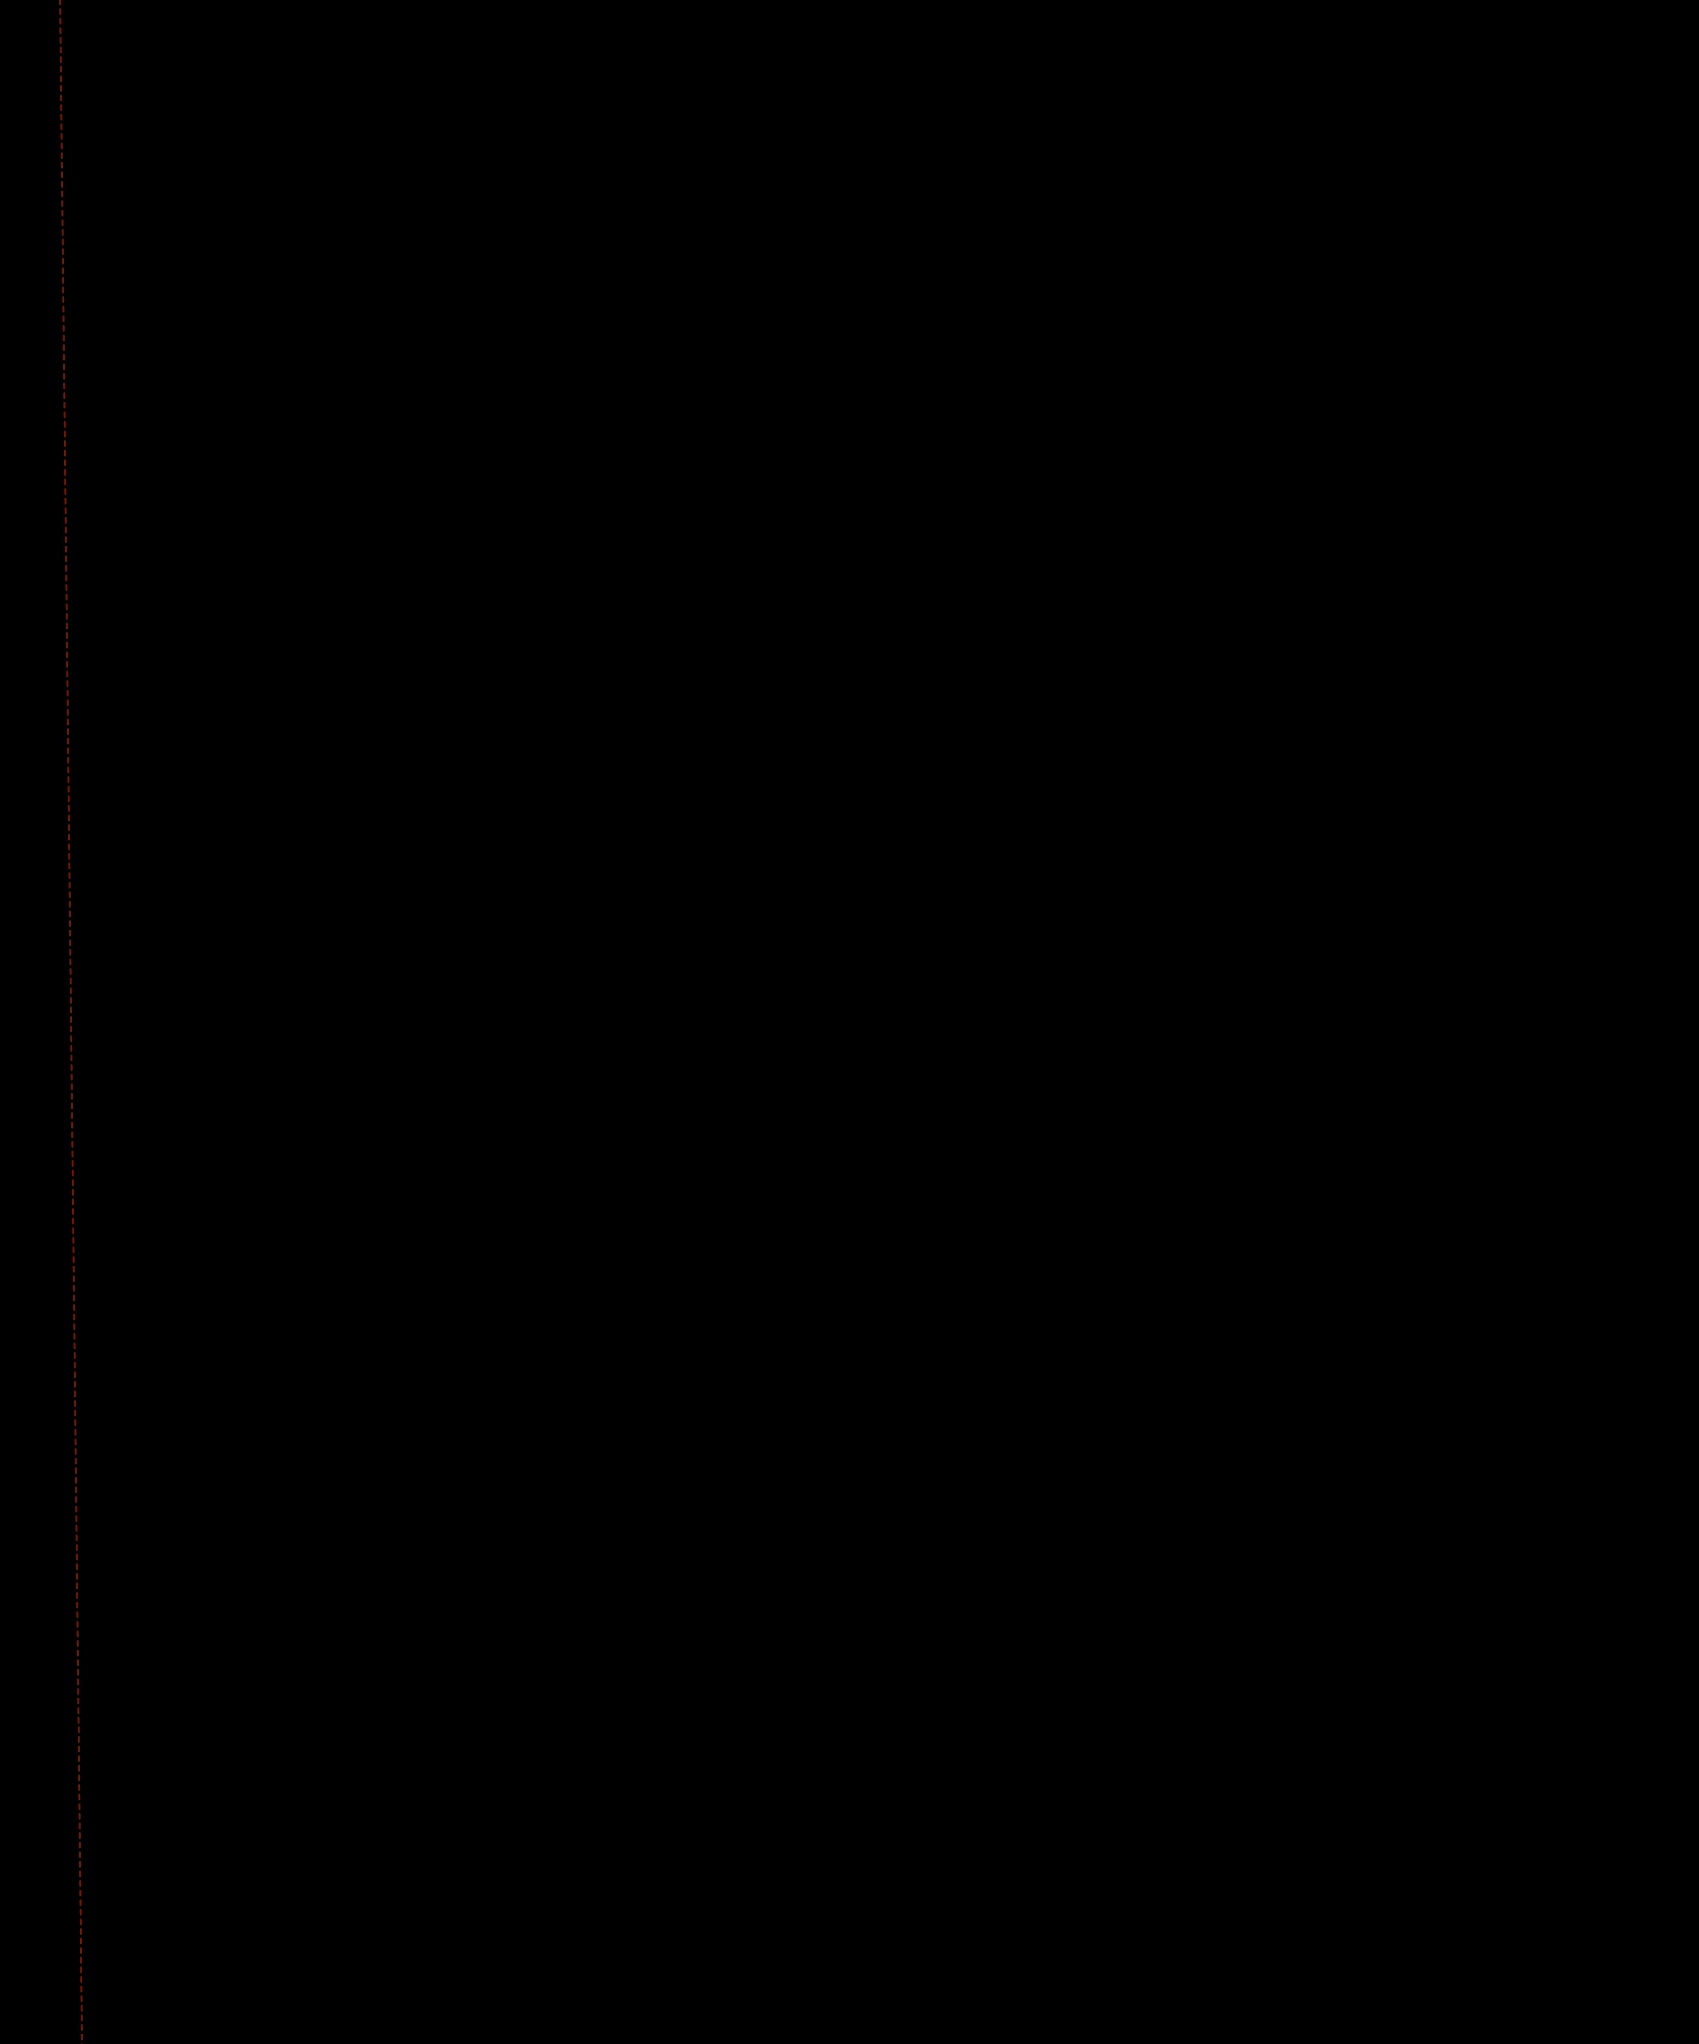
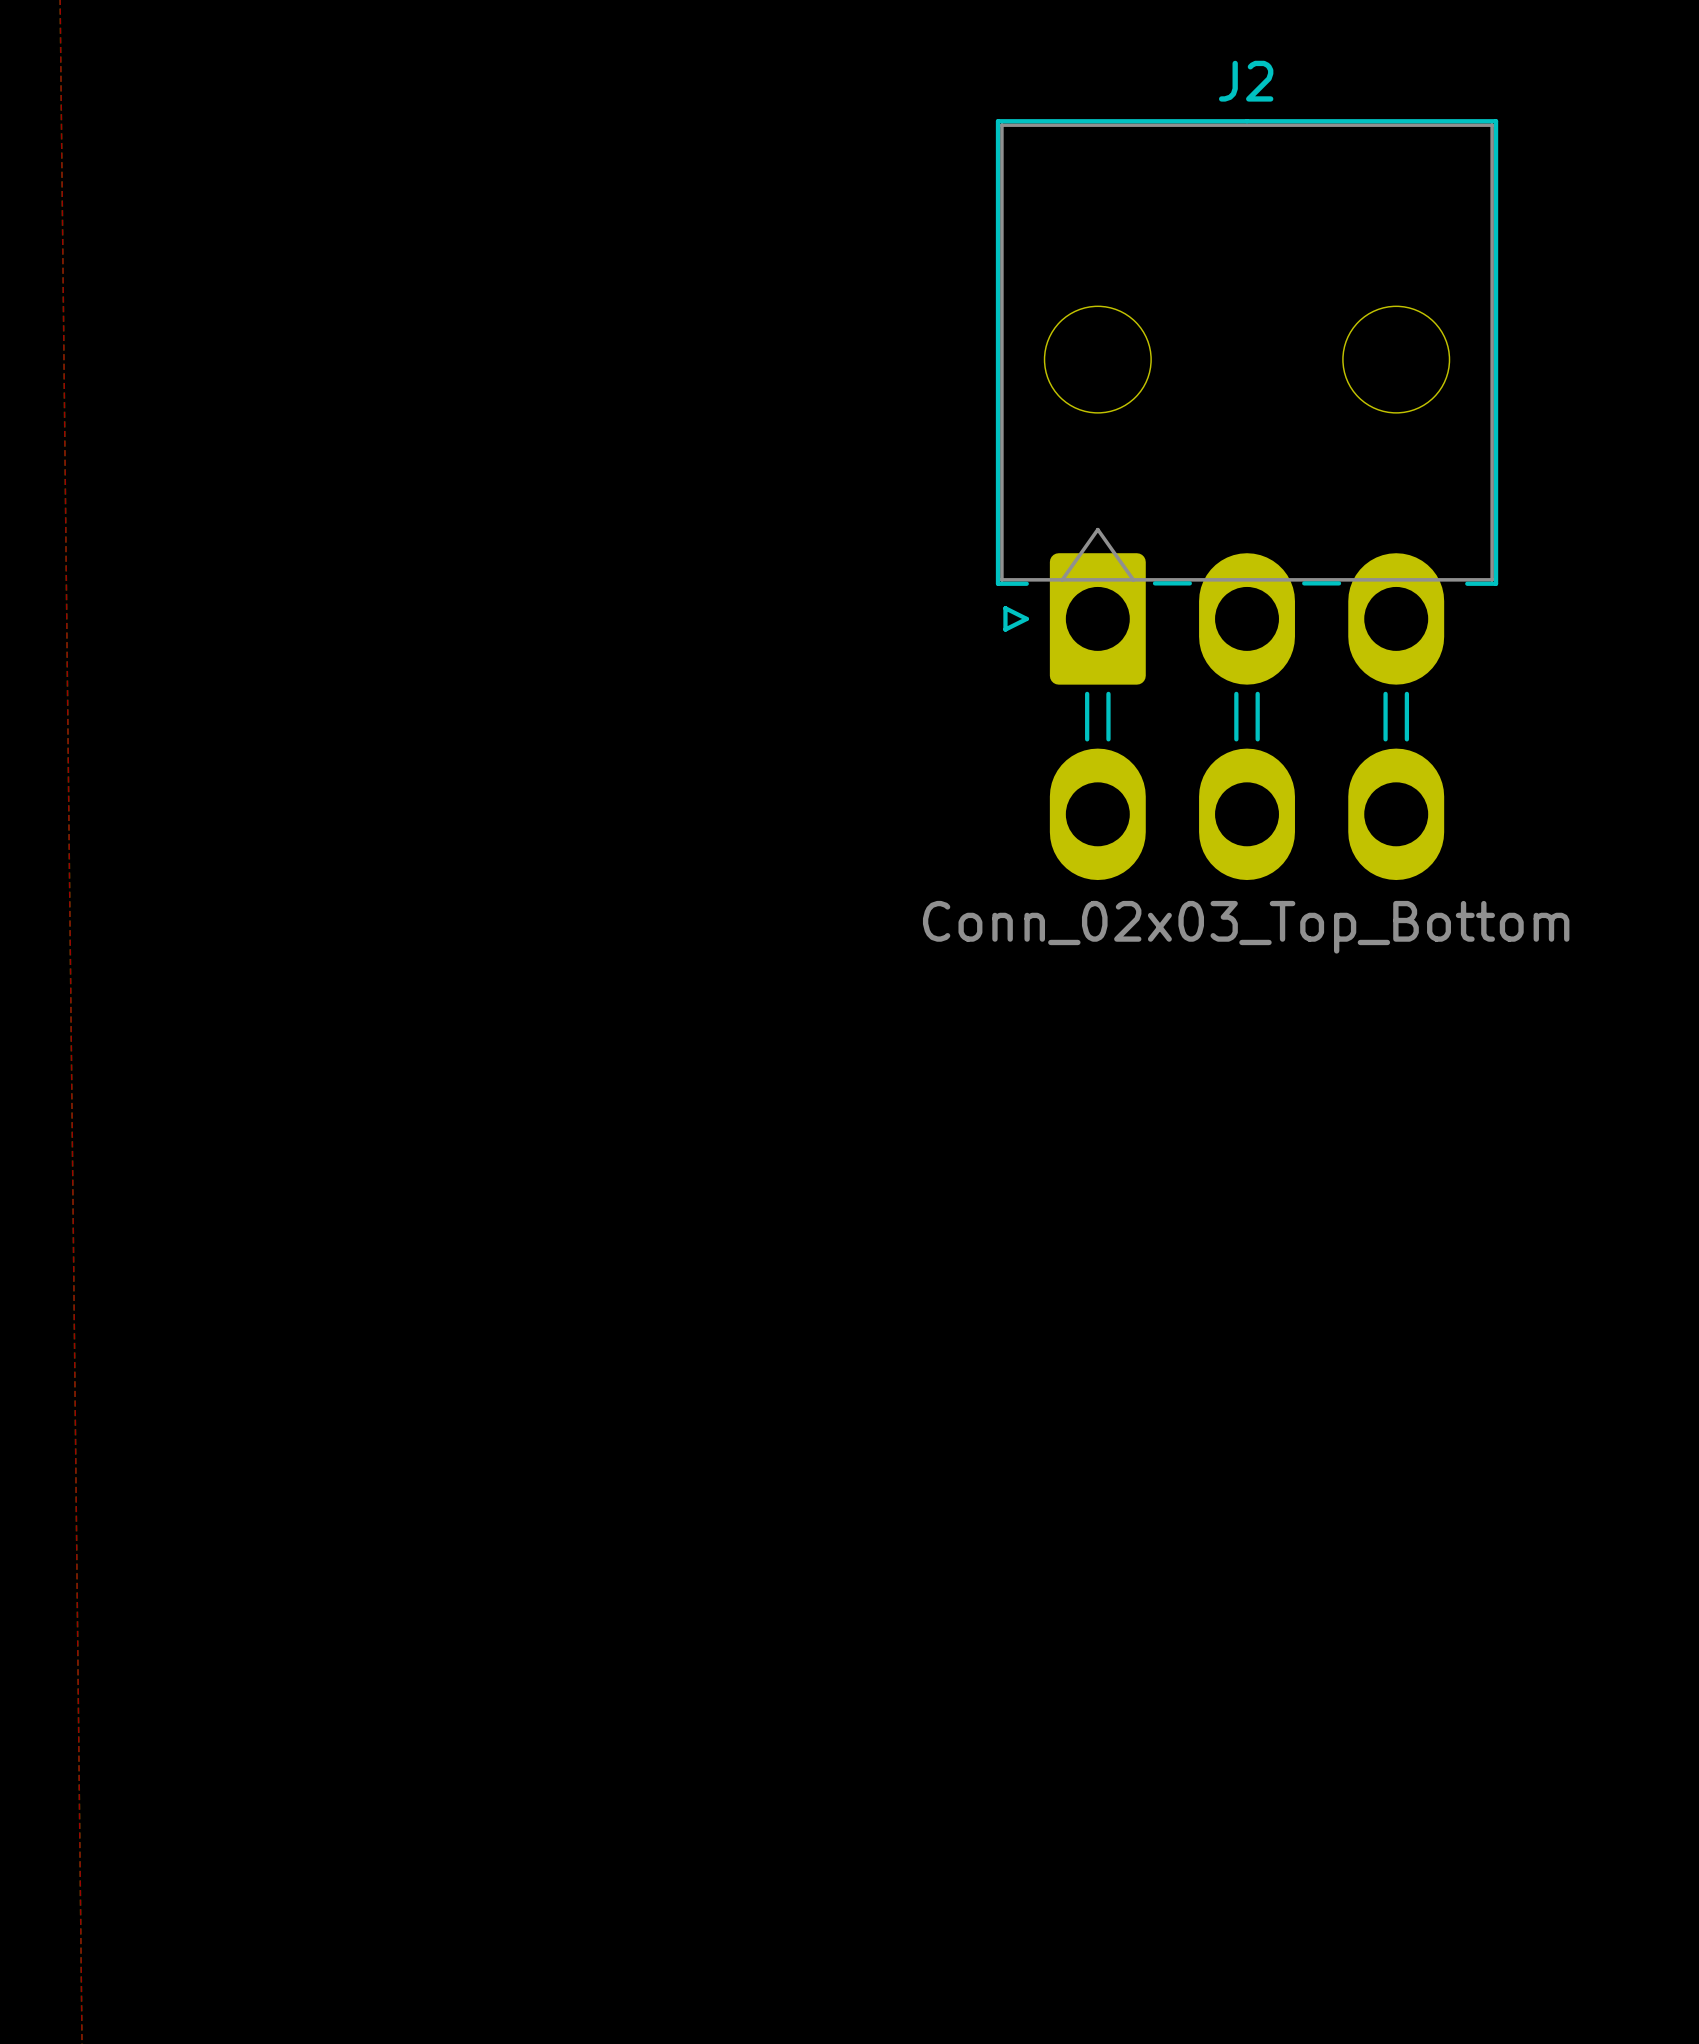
J2: none -> Conn_02x03_Top_Bottom (1247, 499)

